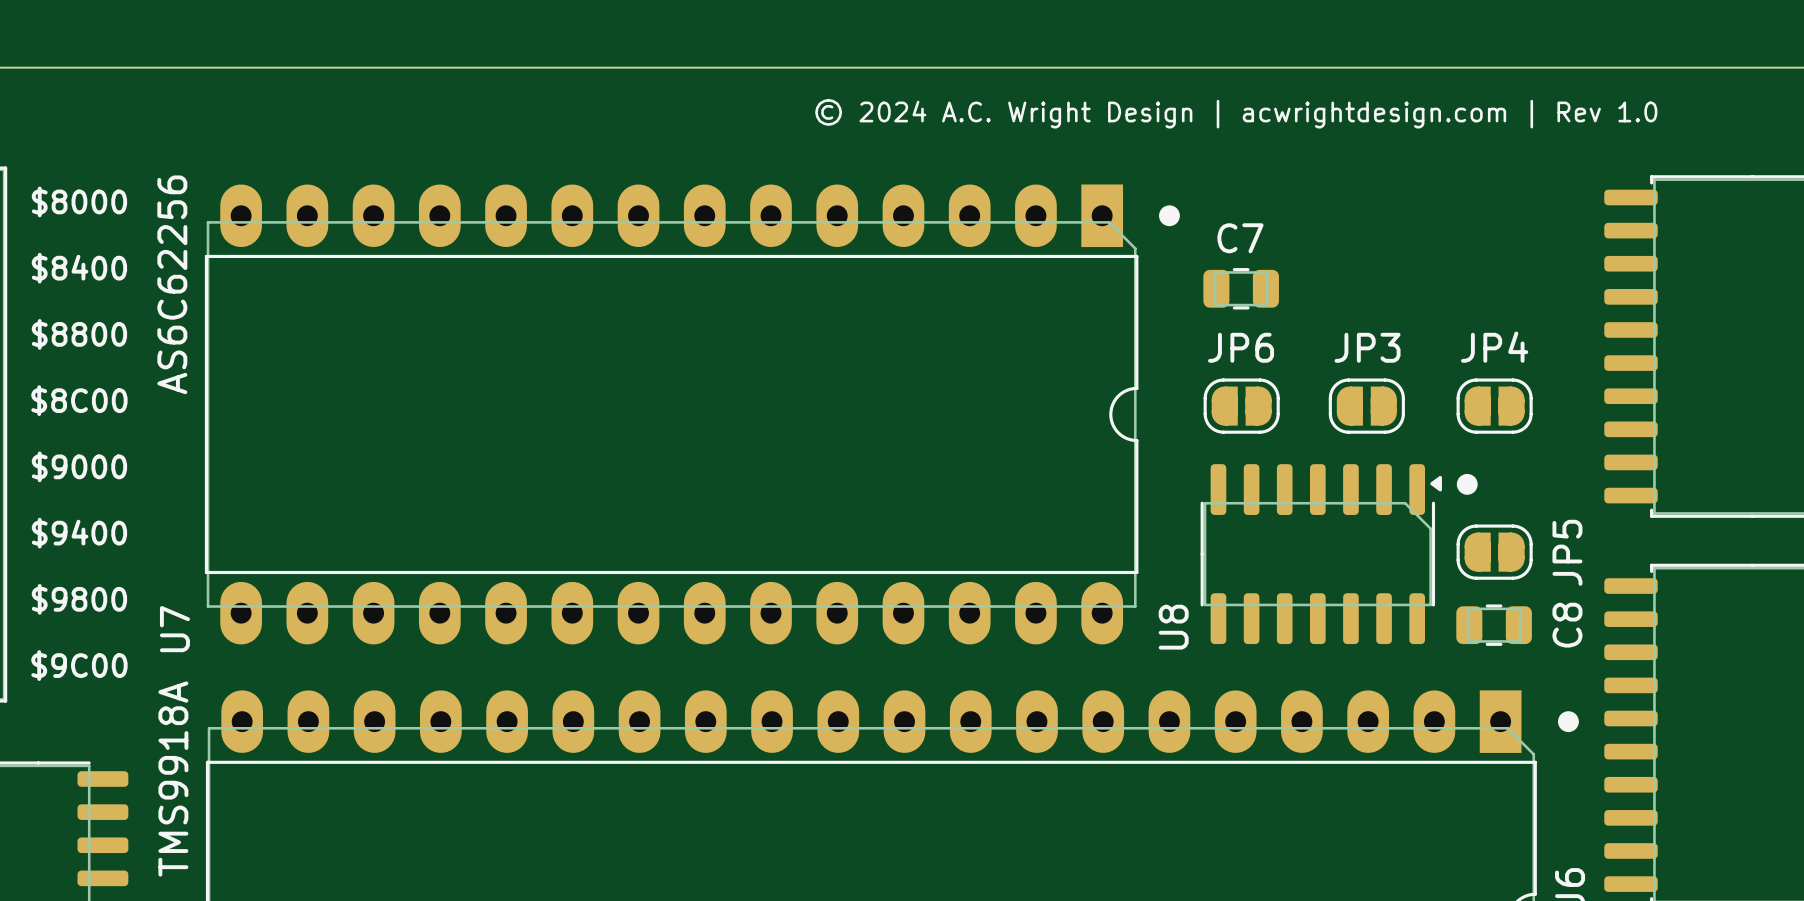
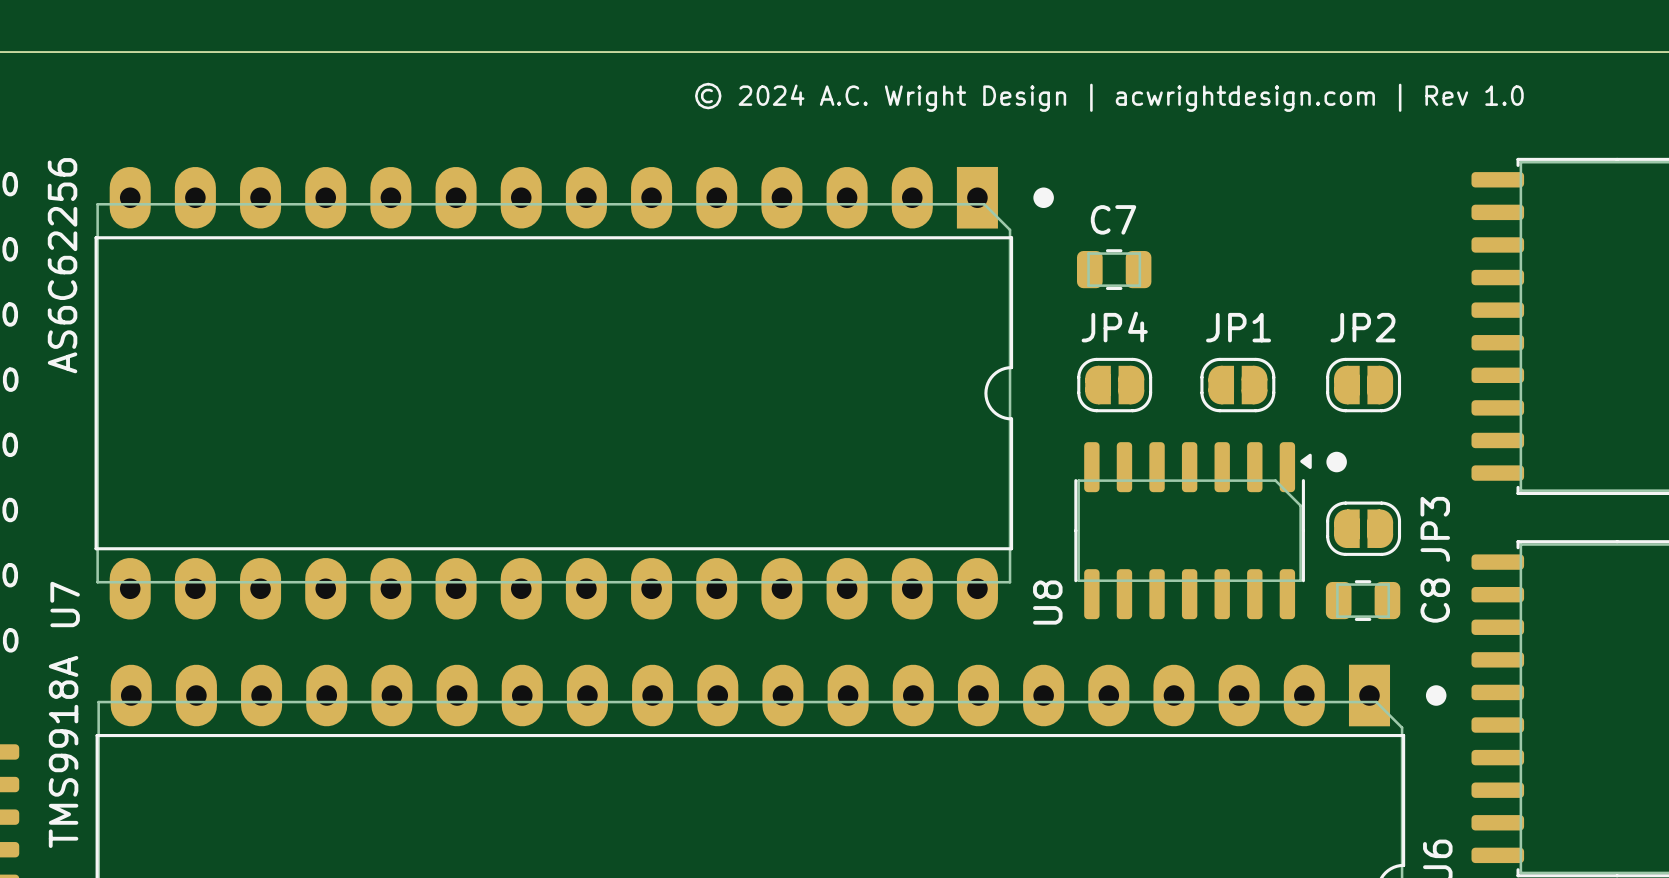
JP6 name: JP6 (1241, 347) -> JP4 (1114, 327)
JP3 name: JP3 (1367, 347) -> JP1 (1238, 327)
JP4 name: JP4 (1494, 347) -> JP2 (1362, 327)
JP5 name: JP5 (1567, 552) -> JP3 (1435, 529)

